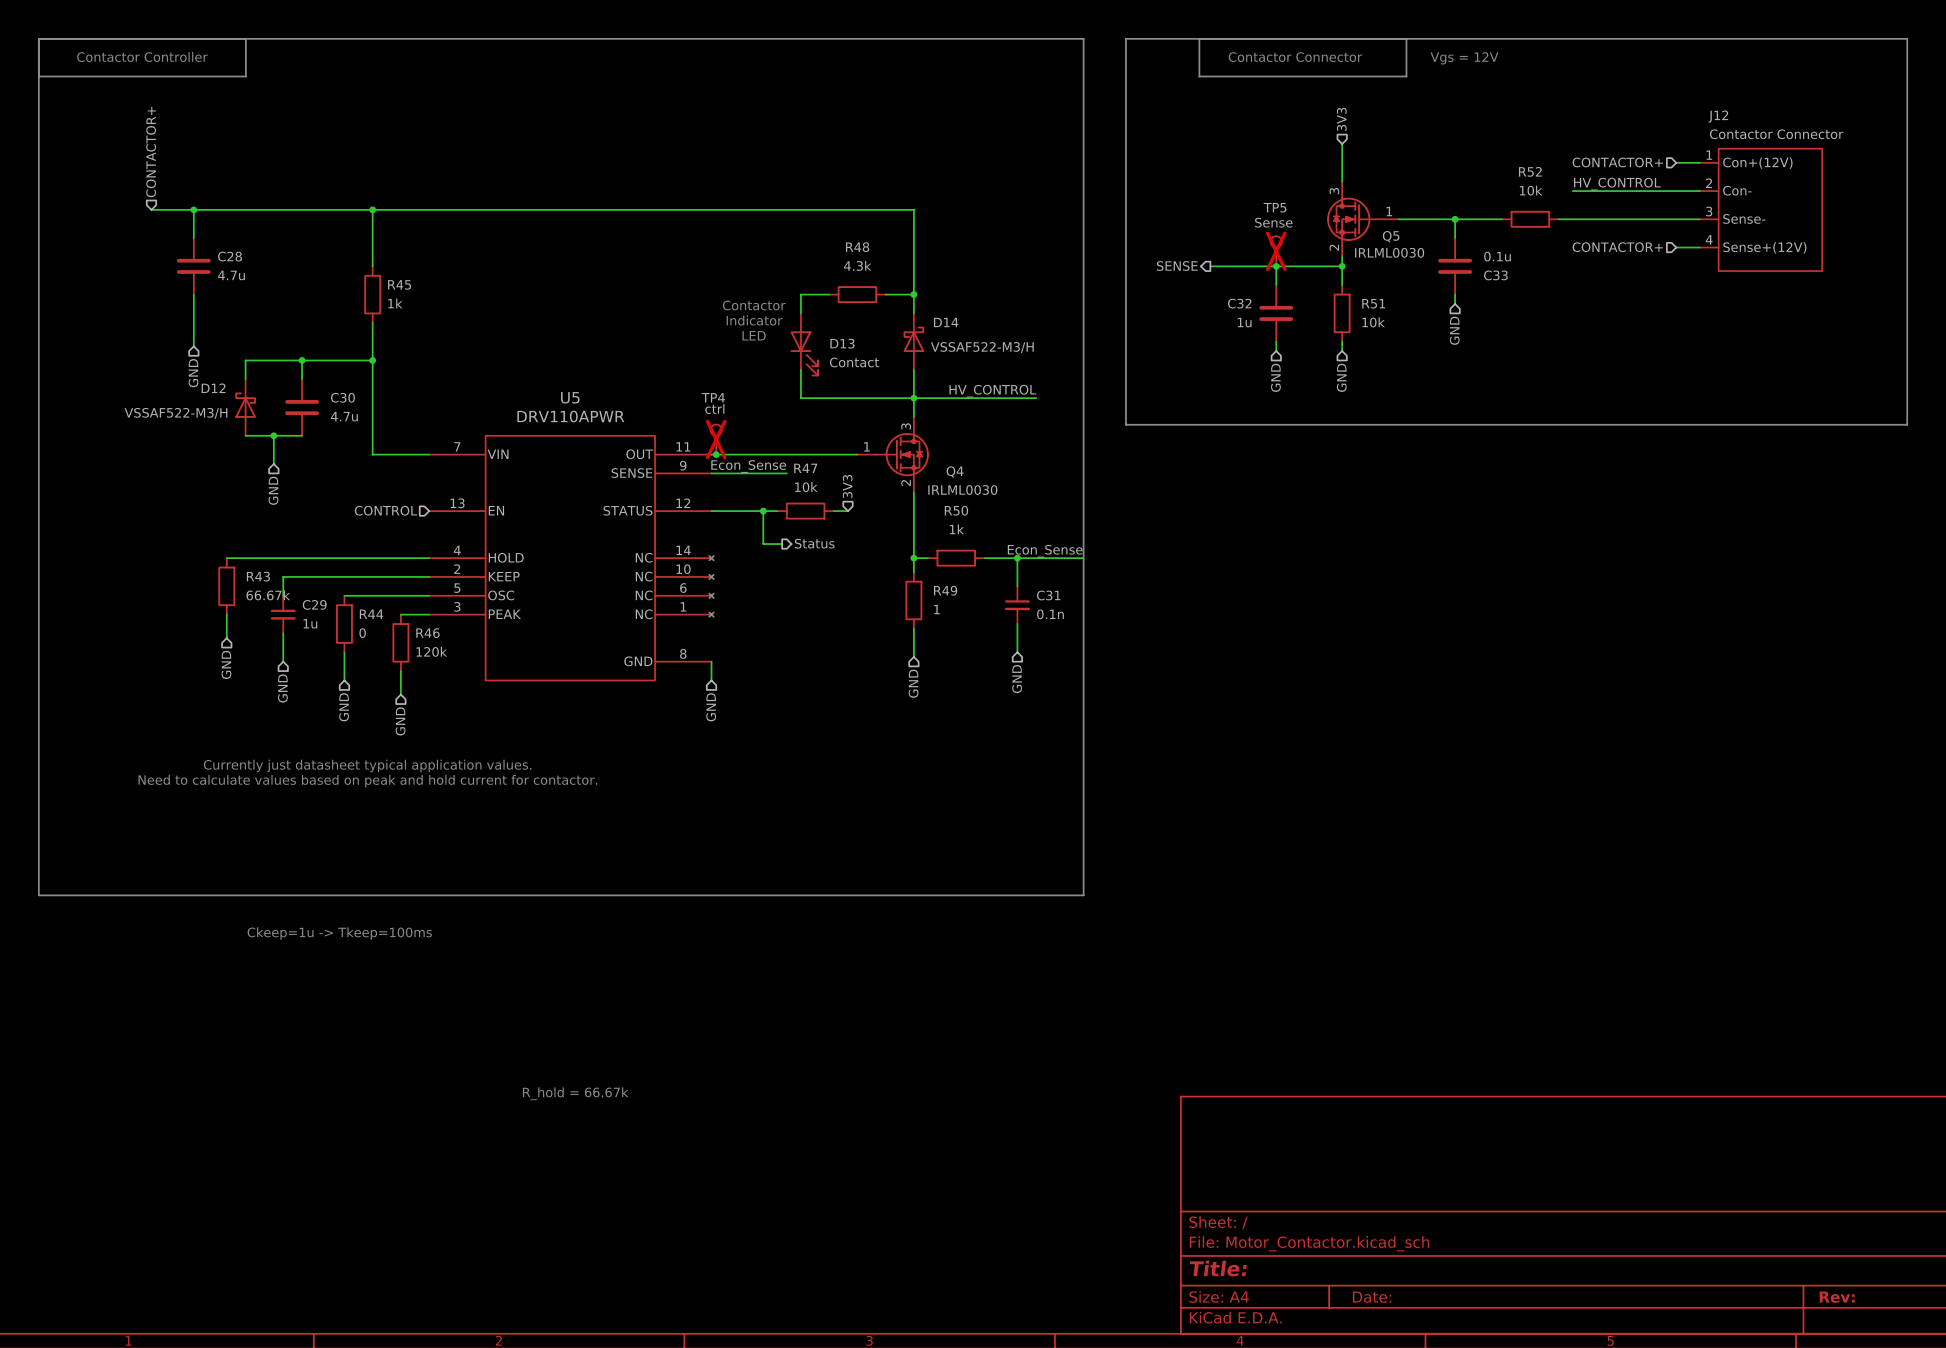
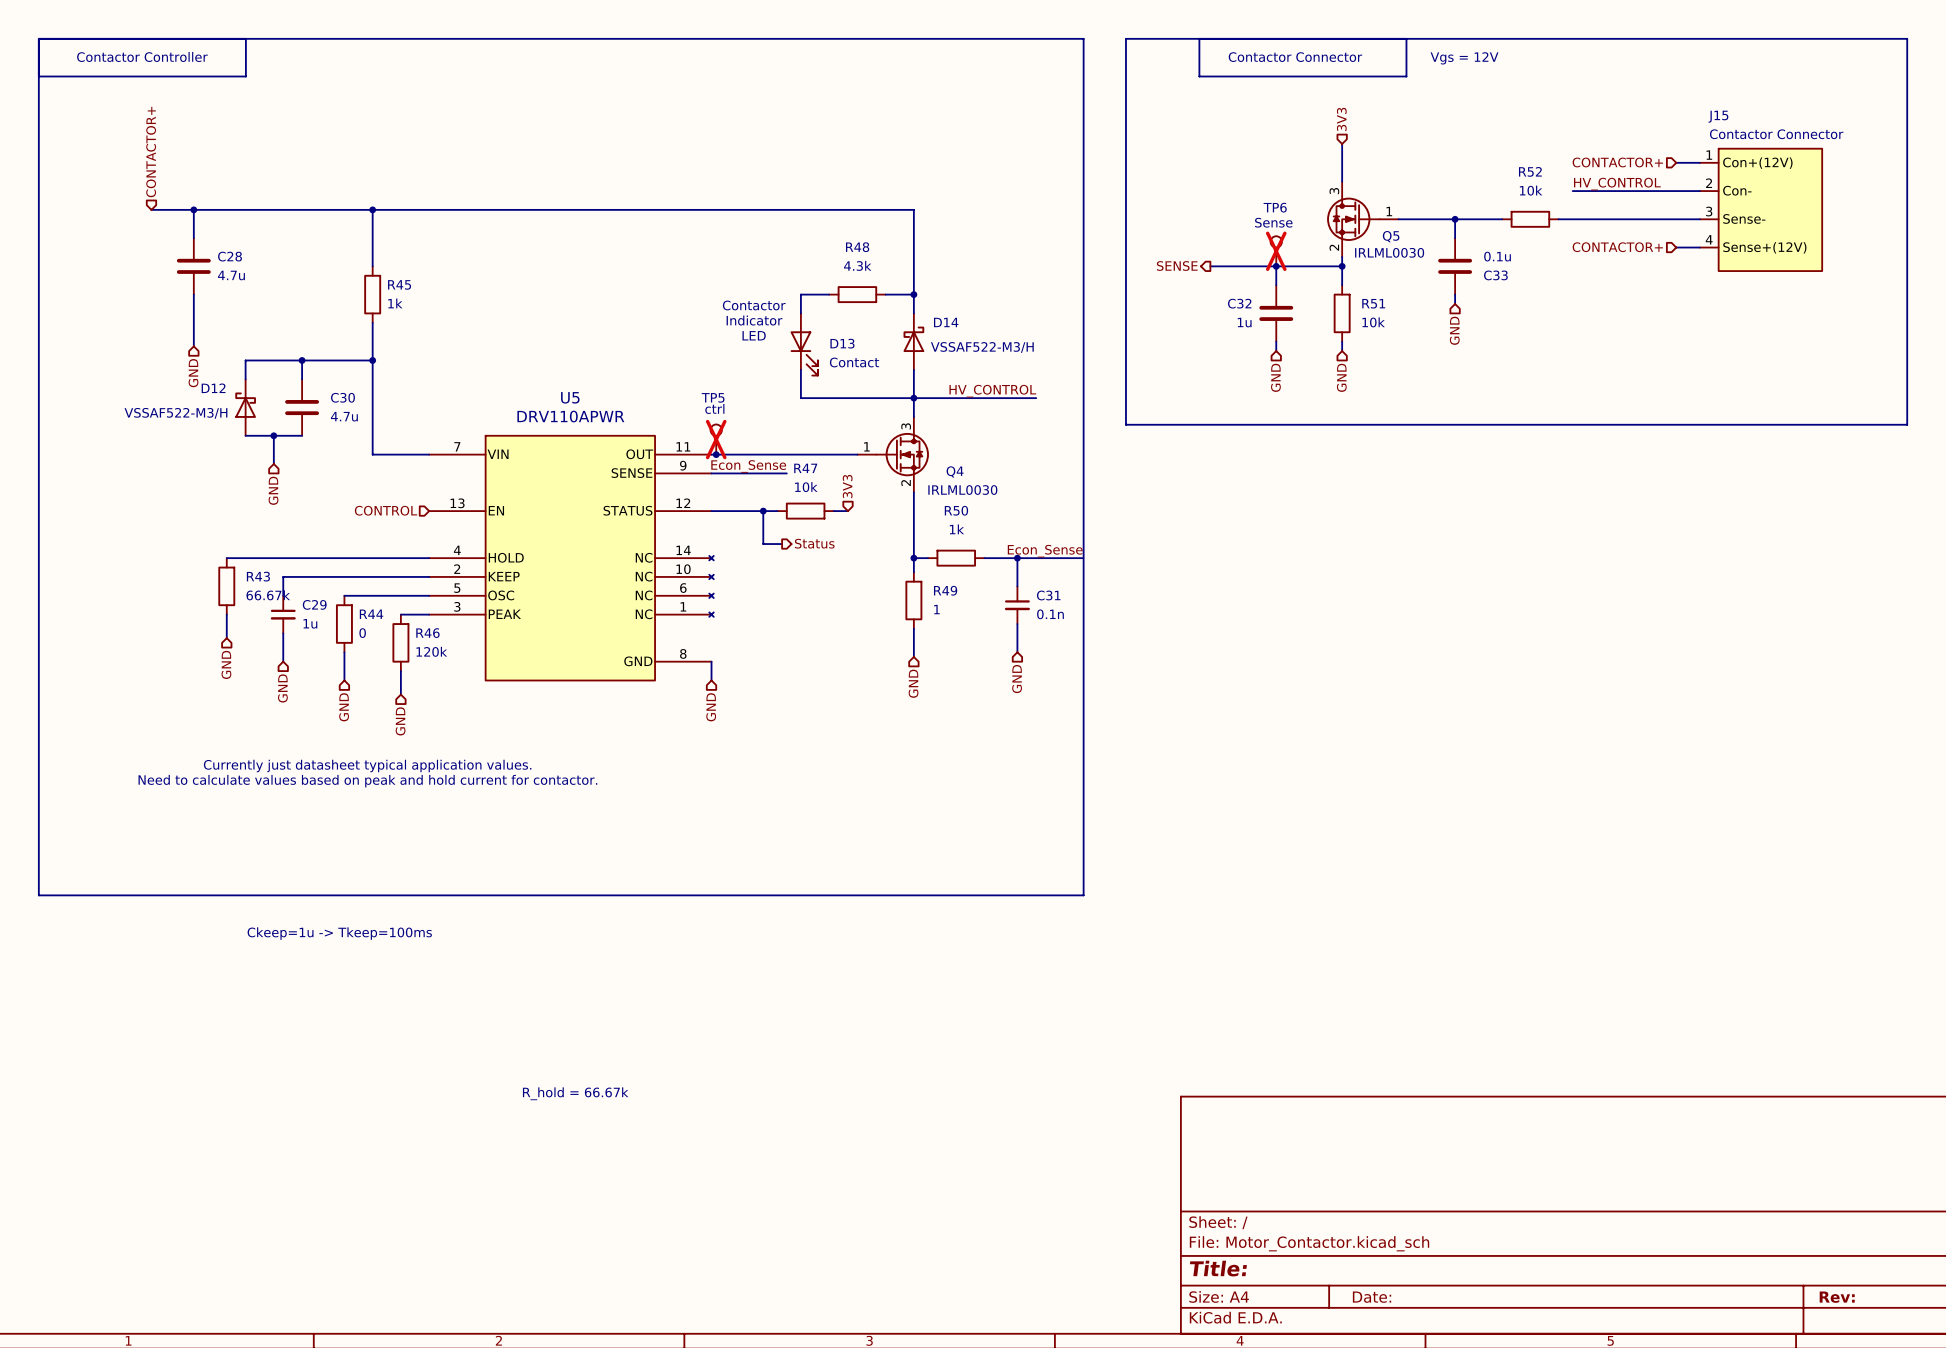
J12 name: J12 (1718, 116) -> J15 (1718, 116)
TP5 name: TP5 (1275, 207) -> TP6 (1275, 207)
TP4 name: TP4 (713, 397) -> TP5 (713, 397)

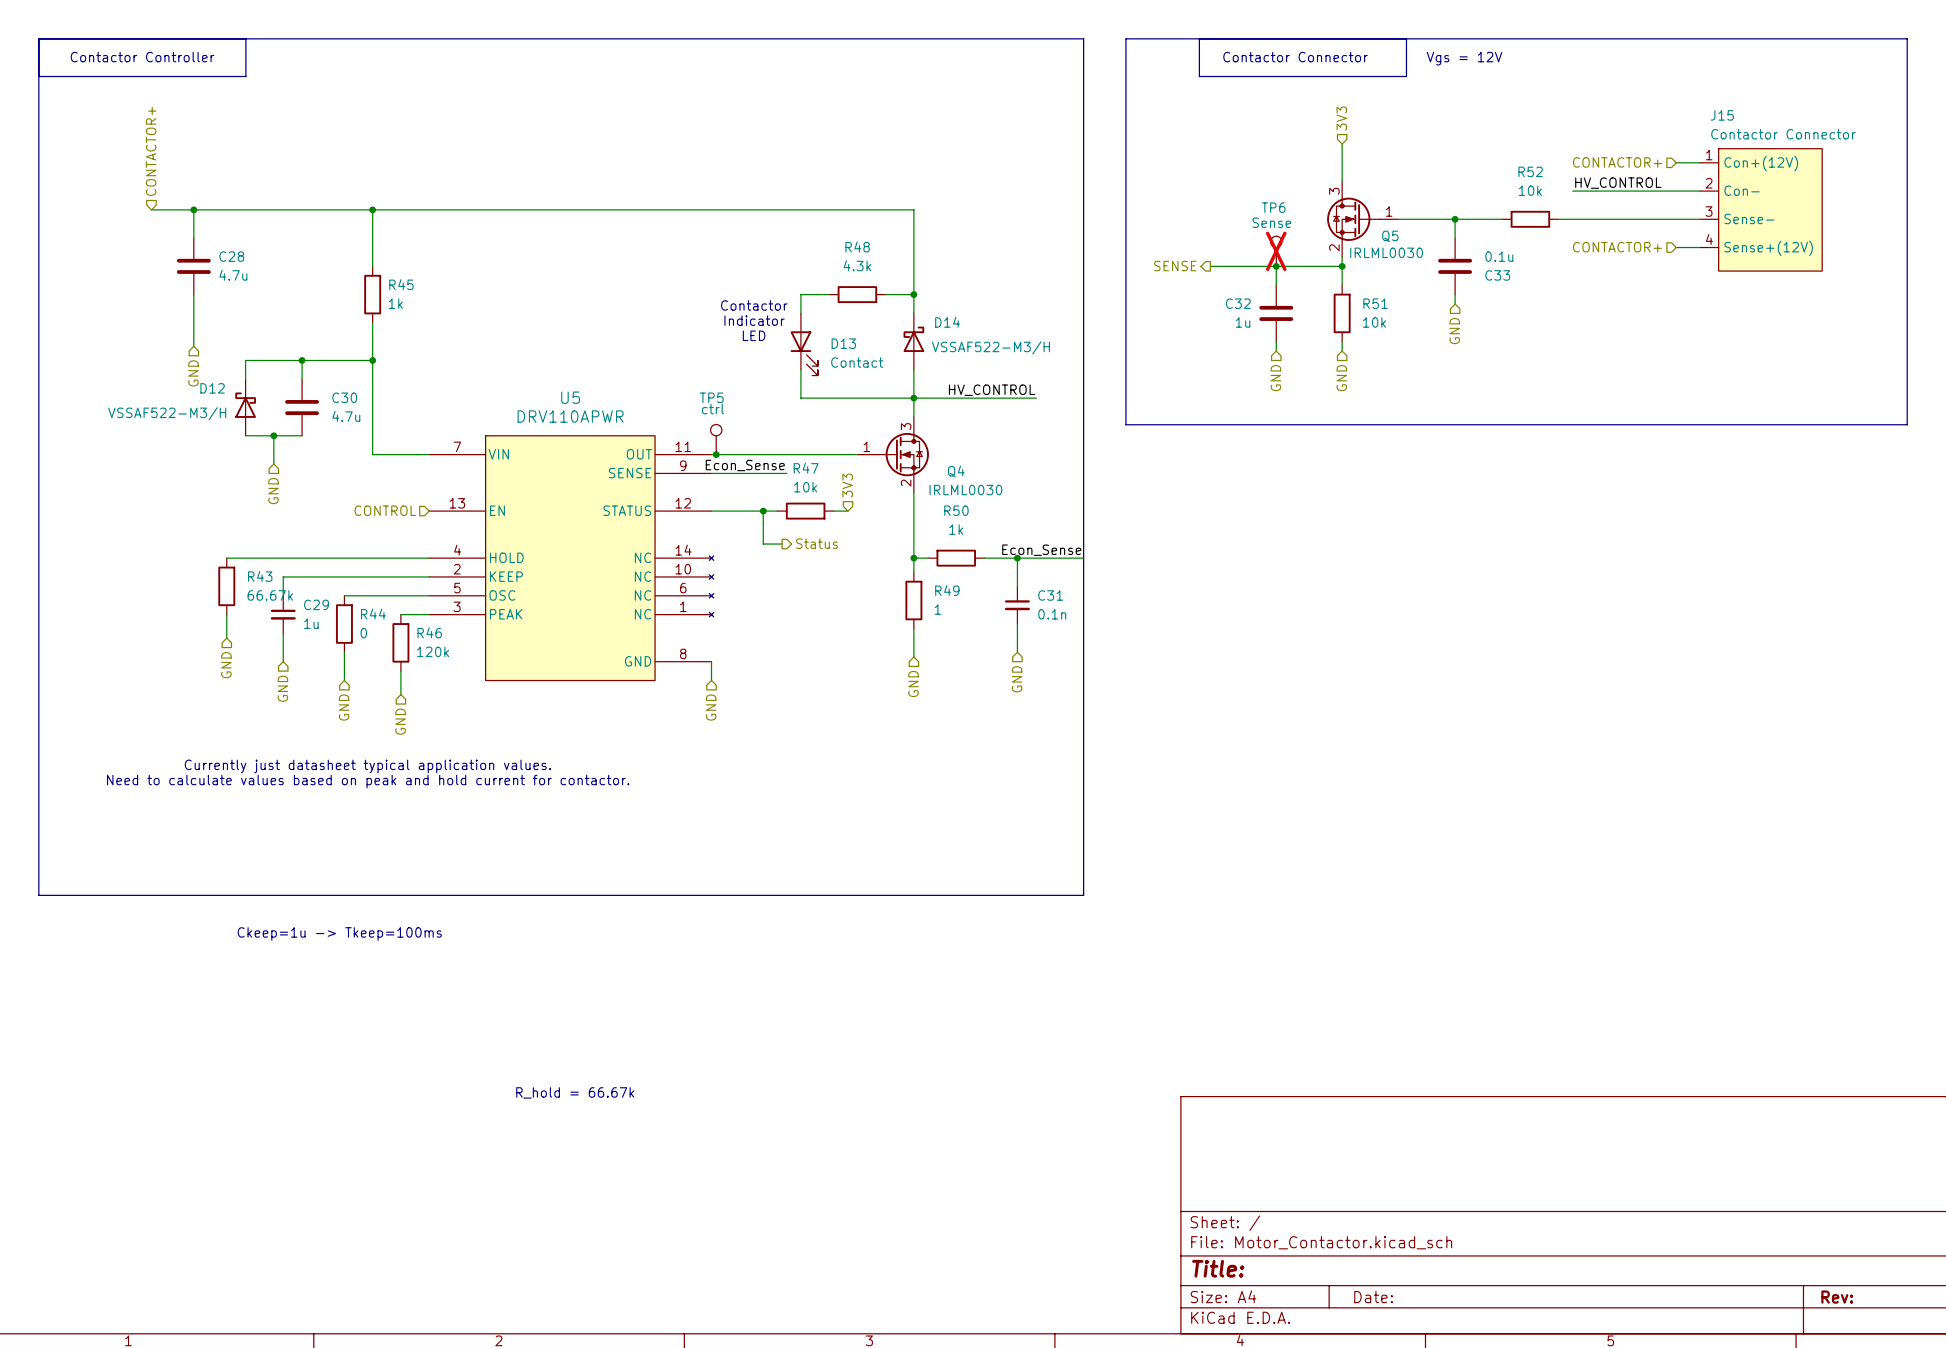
TP5 do-not-place cross: (716, 439) -> none

